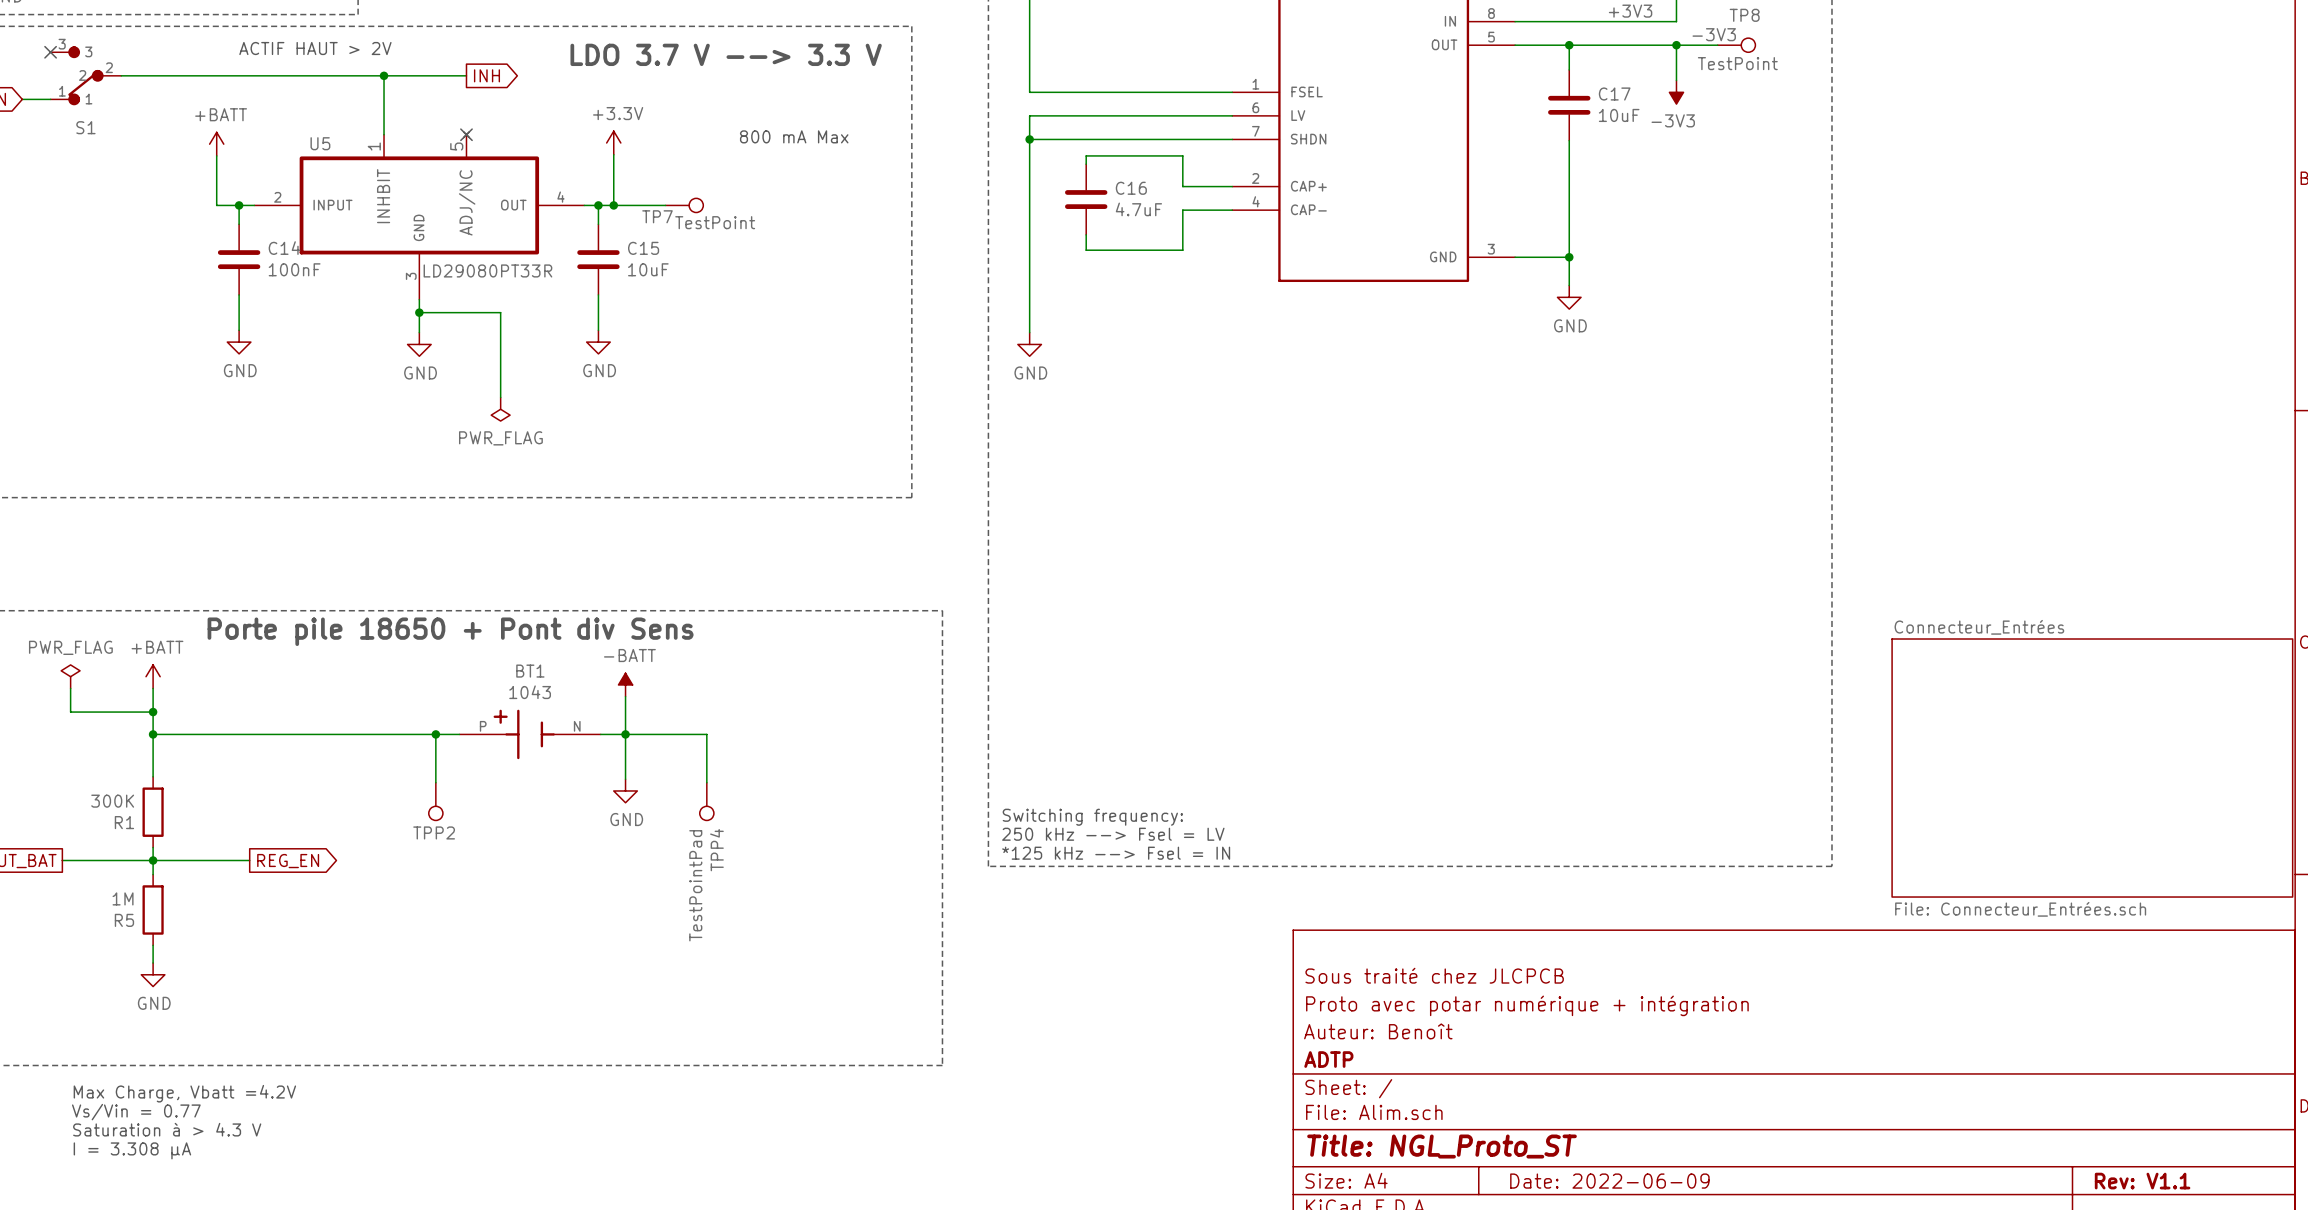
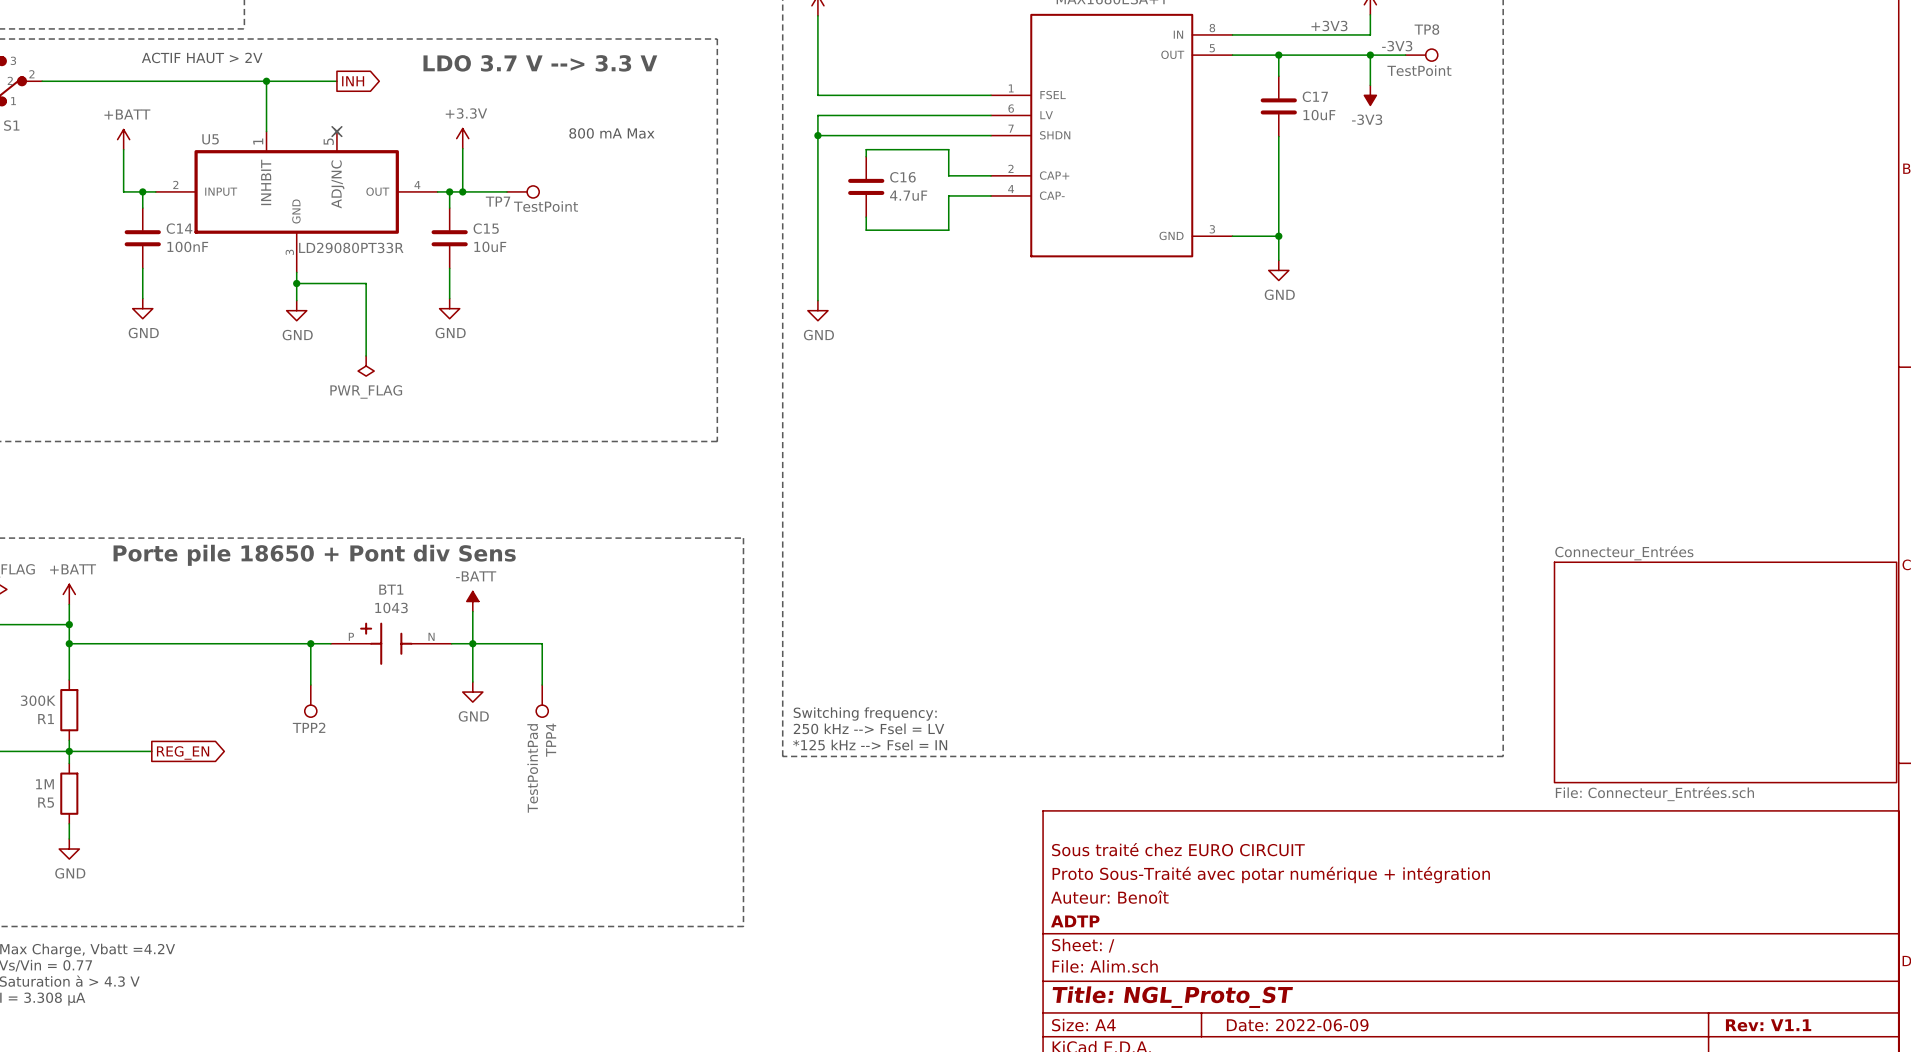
title block: Sous traité chez JLCPCB (1434, 975) -> Sous traité chez EURO CIRCUIT (1178, 849)
title block: Proto avec potar numérique + intégration (1527, 1005) -> Proto Sous-Traité avec potar numérique + intégration (1271, 874)

